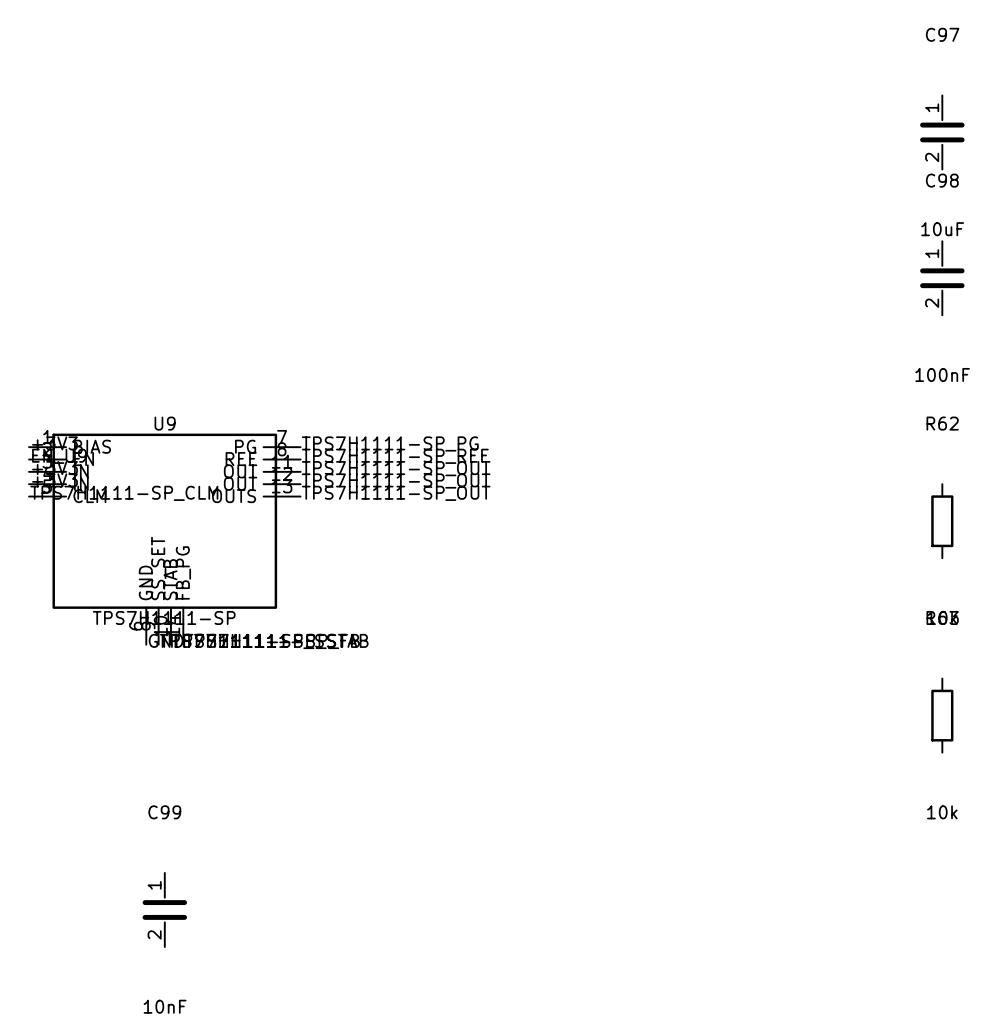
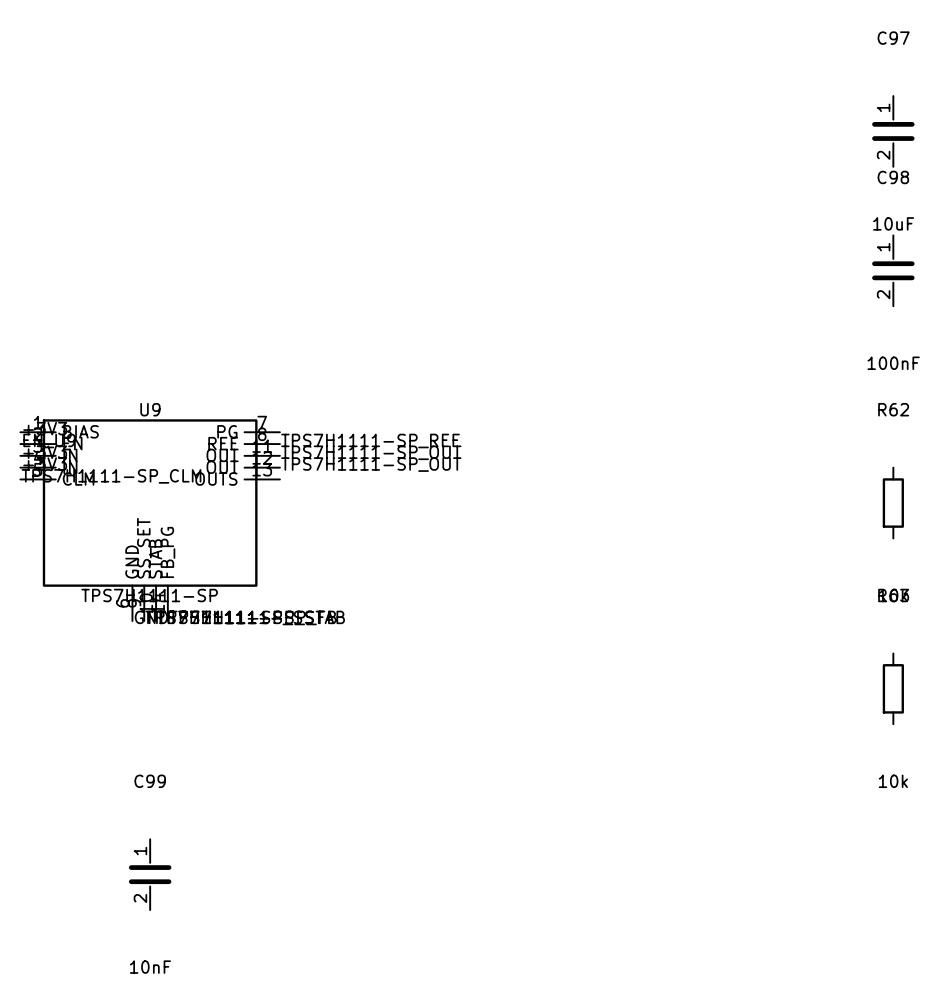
label: TPS7H1111-SP_PG (390, 443) -> none
label: TPS7H1111-SP_OUT (396, 493) -> none

